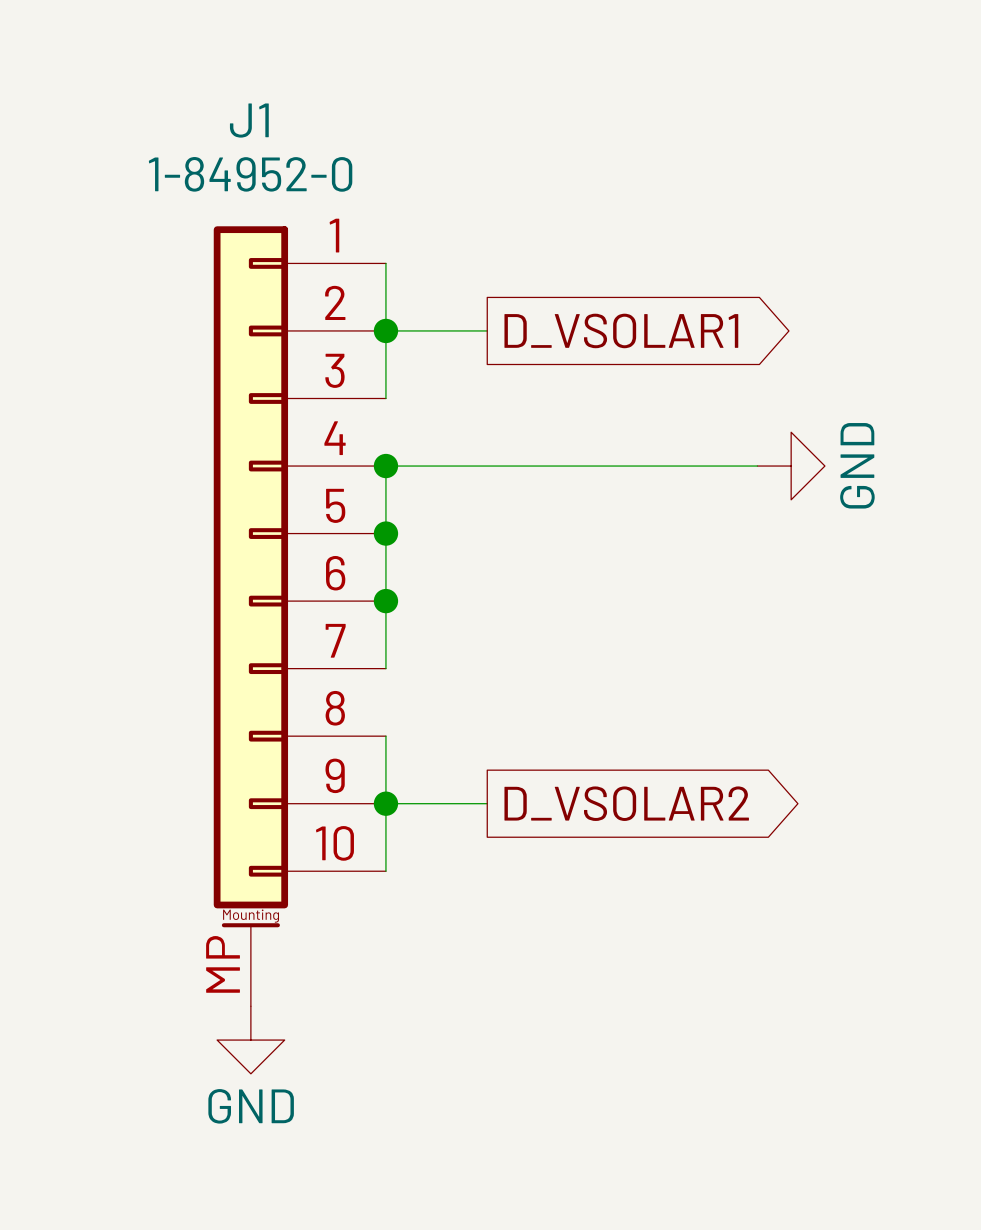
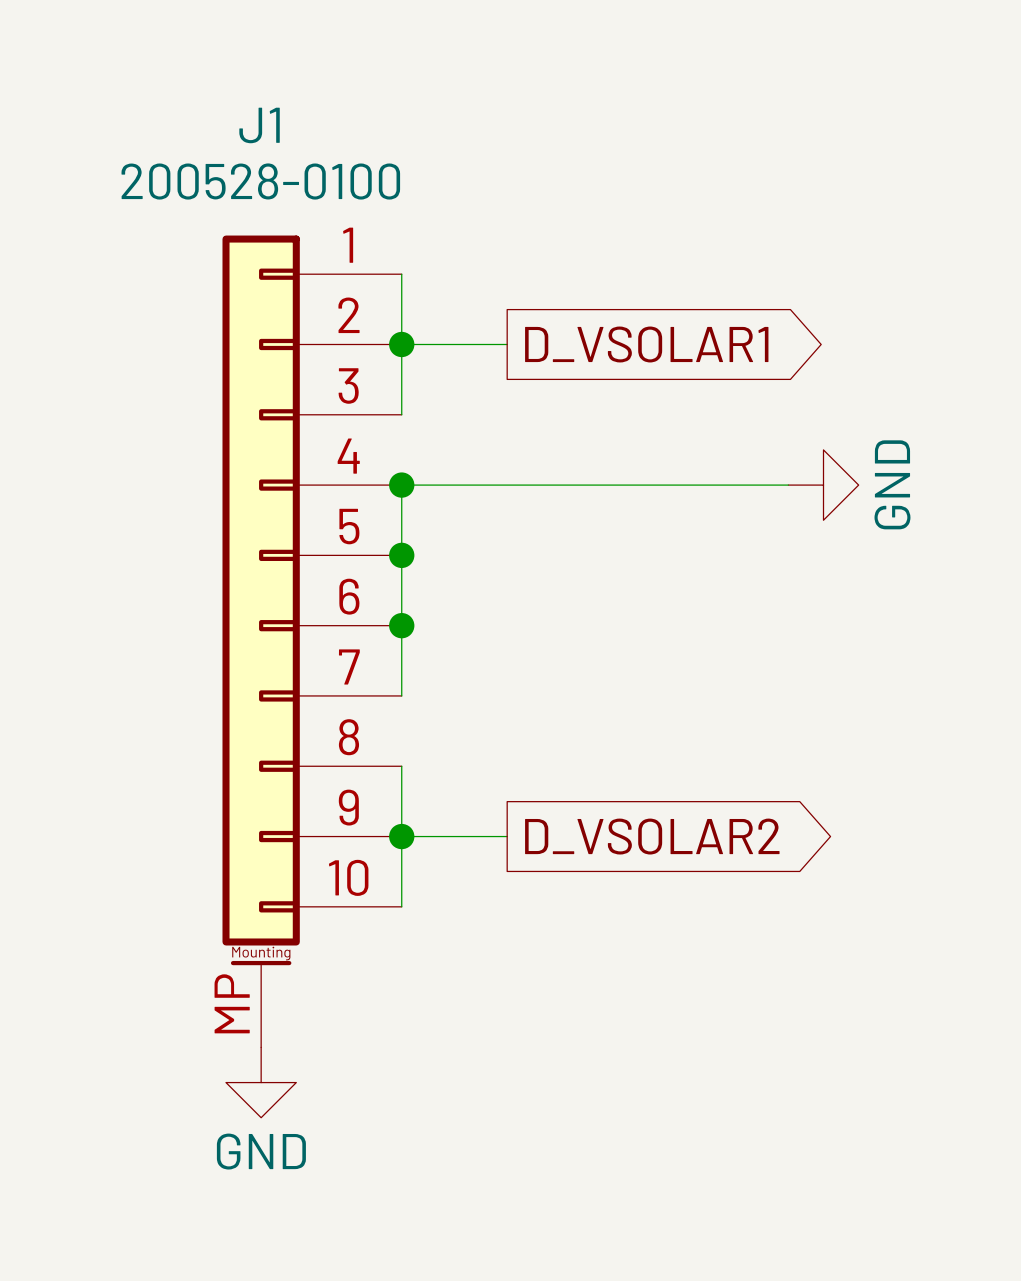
J1 value: 1-84952-0 (250, 174) -> 200528-0100 (260, 181)

